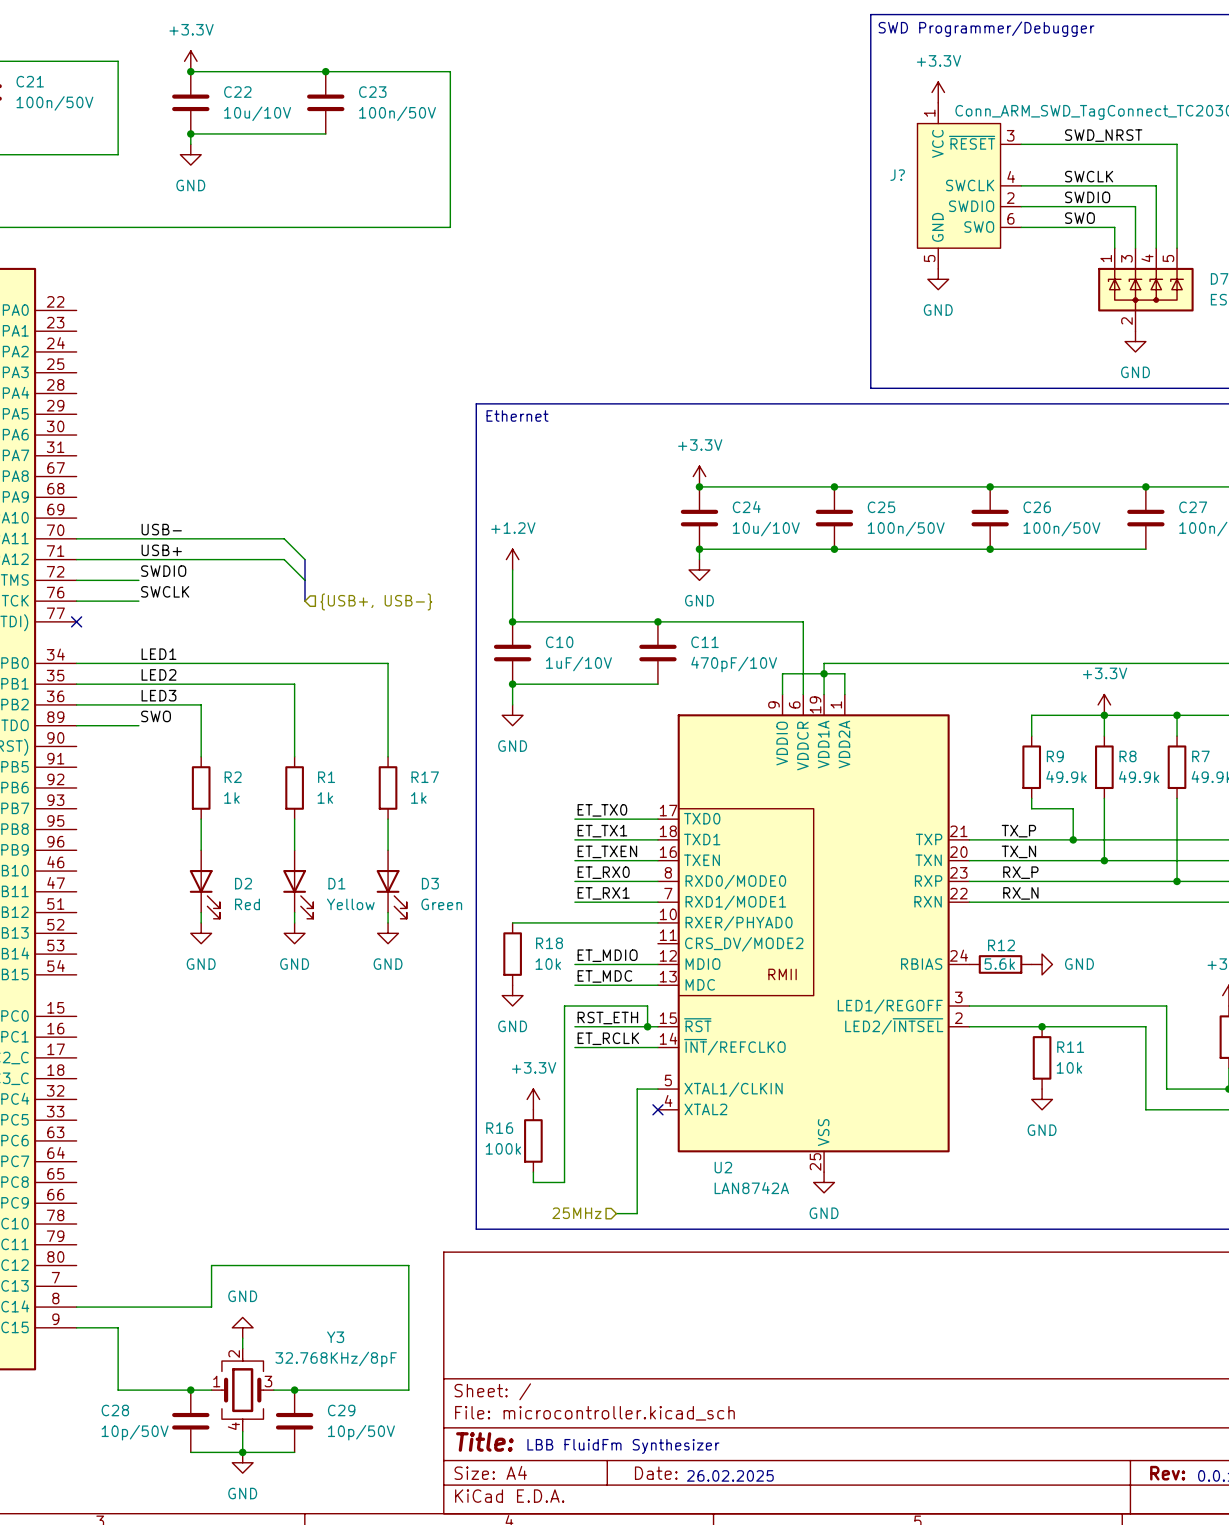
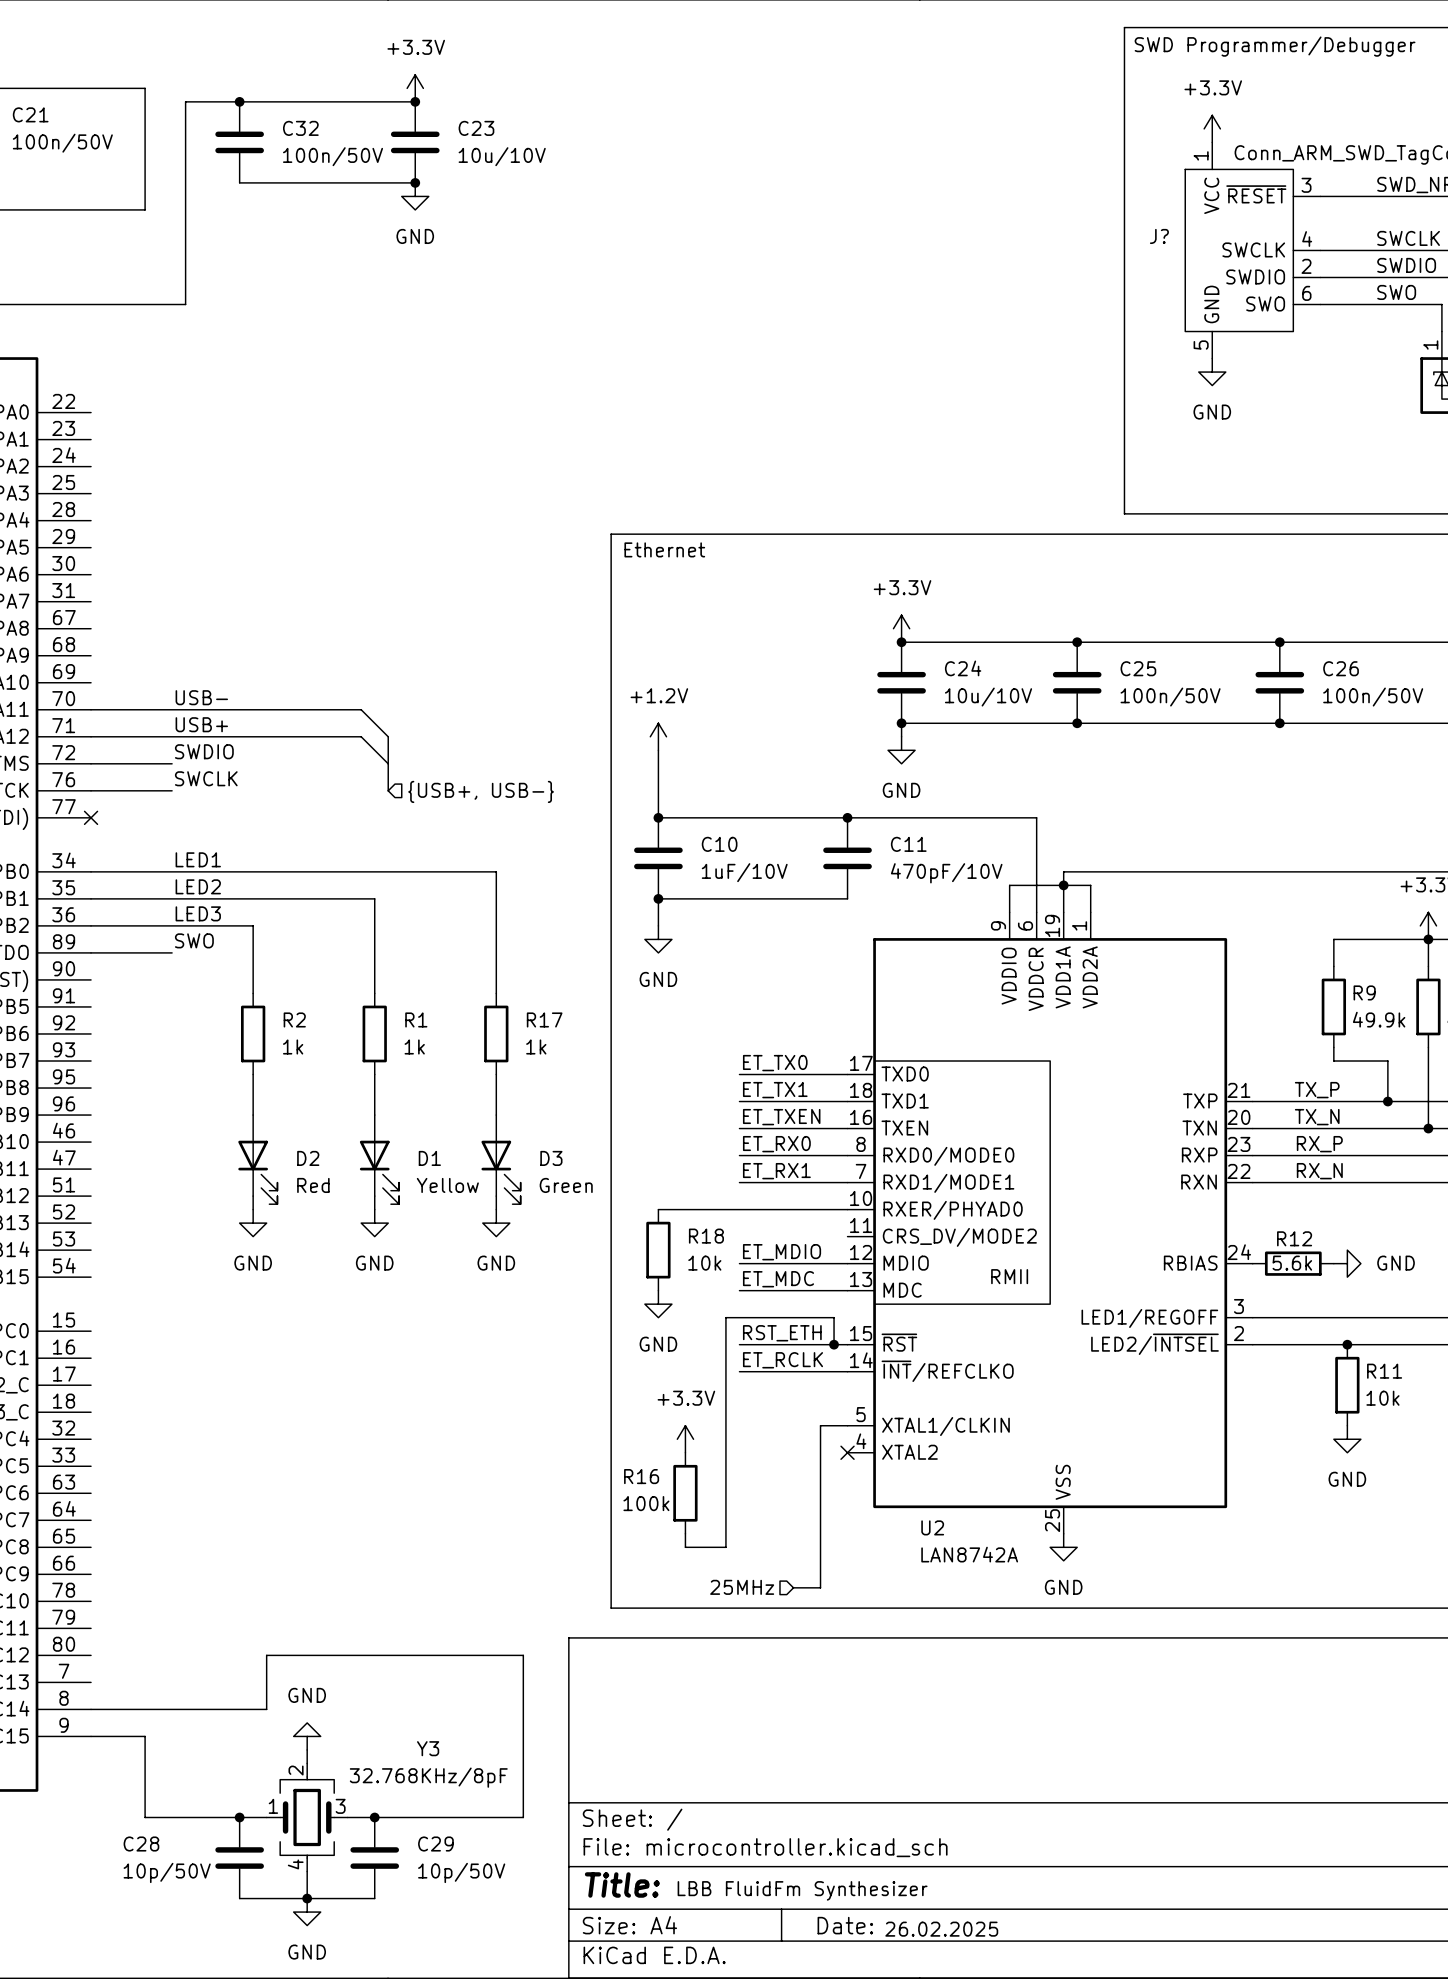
power symbol position: +3.3V (190, 61) -> +3.3V (415, 88)
wire: (325, 71) (450, 71) (450, 227) (149, 227) -> (239, 101) (185, 101) (185, 304)
C22 name: C22 (237, 92) -> C32 (300, 128)
C22 value: 10u/10V (257, 113) -> 100n/50V (333, 156)
C23 value: 100n/50V (397, 113) -> 10u/10V (502, 156)
wire: (190, 133) (190, 144) -> none
junction: (190, 133) -> none
junction: none -> (415, 182)
power symbol position: GND (190, 154) -> GND (415, 196)

